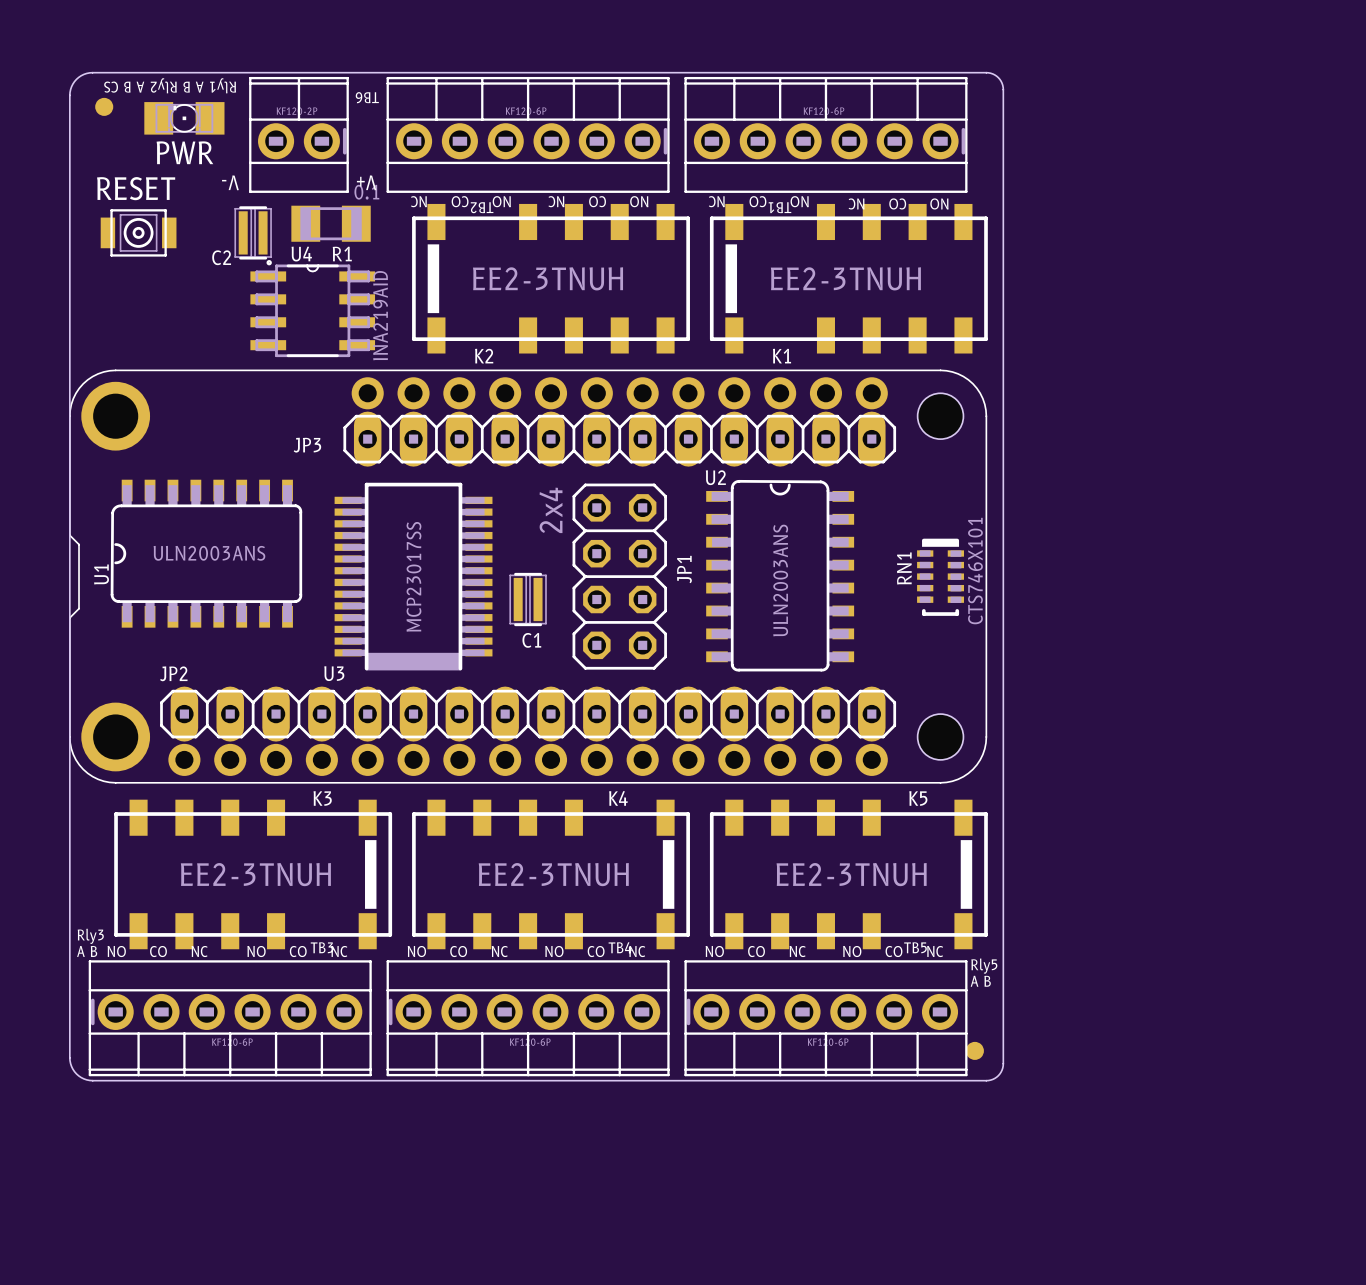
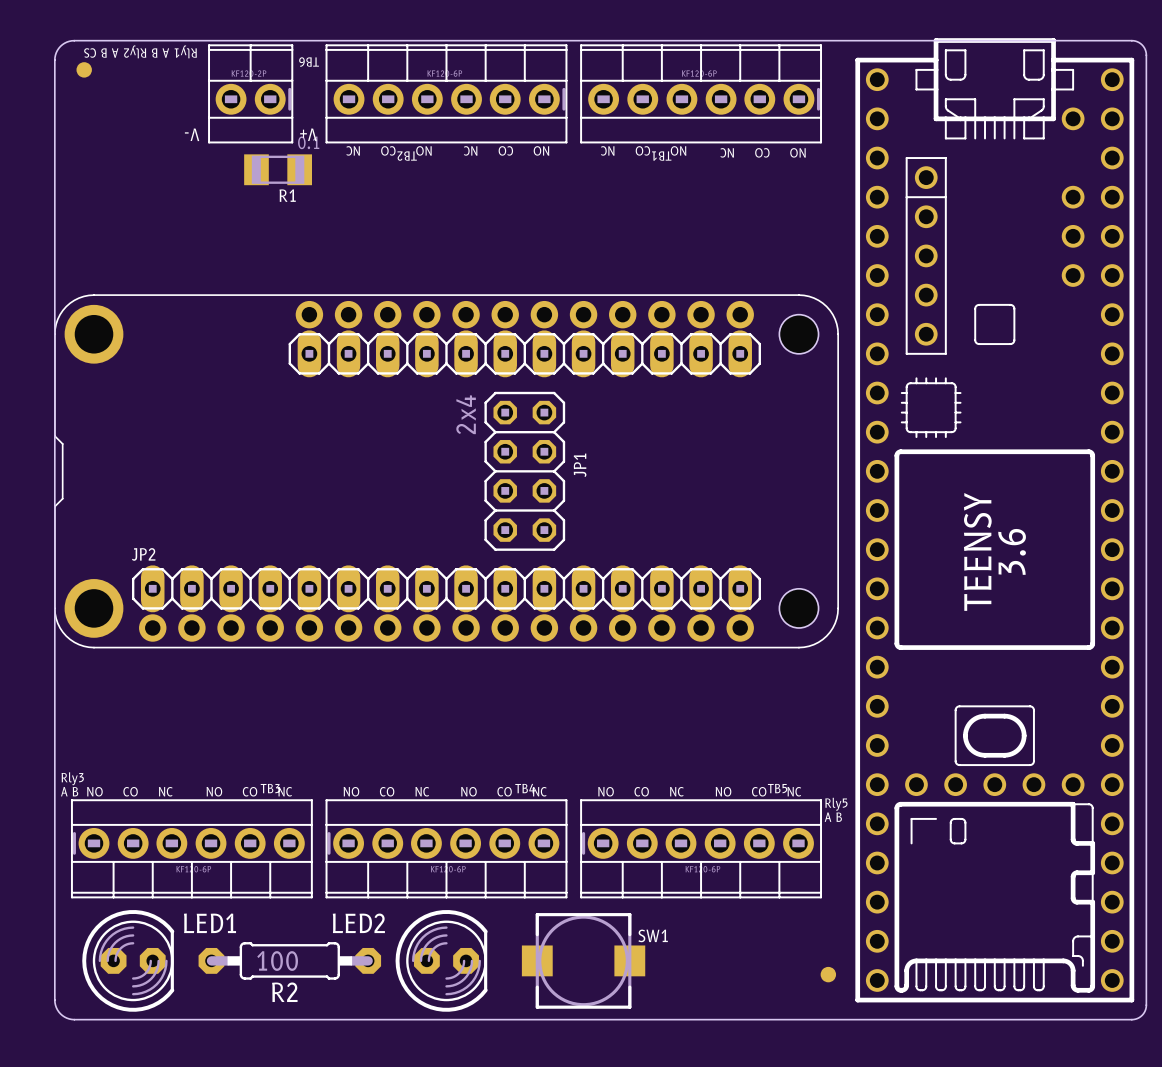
board edge: (986, 72) (998, 77) (1003, 89) (1003, 1063) (998, 1075) (986, 1080) (92, 1080) (83, 1078) (76, 1073) (71, 1066) (69, 1057) -> (838, 40) (1131, 40) (1140, 43) (1145, 51) (1146, 1005) (1142, 1015) (1131, 1019) (71, 1019) (60, 1013) (55, 1002) (54, 882)
PWR: (184, 118) -> none
RESET: (138, 232) -> none
C2: (253, 232) -> none
K2: EE2-3TNUH (551, 278) -> none
K1: EE2-3TNUH (848, 278) -> none
U4: INA219AID (312, 308) -> none
JP3 name: JP3 (307, 445) -> none
U1: ULN2003ANS (206, 553) -> none
U2: ULN2003ANS (780, 575) -> none
U3: MCP23017SS (413, 576) -> none
RN1: CTS746X101 (940, 577) -> none
C1: (528, 599) -> none
part: none -> (994, 520)
K3: EE2-3TNUH (253, 874) -> none
K4: EE2-3TNUH (551, 874) -> none
K5: EE2-3TNUH (848, 874) -> none
part position: (974, 1050) -> (828, 974)
LED1: none -> (128, 960)
R2: none -> 100 (289, 960)
LED2: none -> (441, 960)
SW1: none -> (583, 960)

